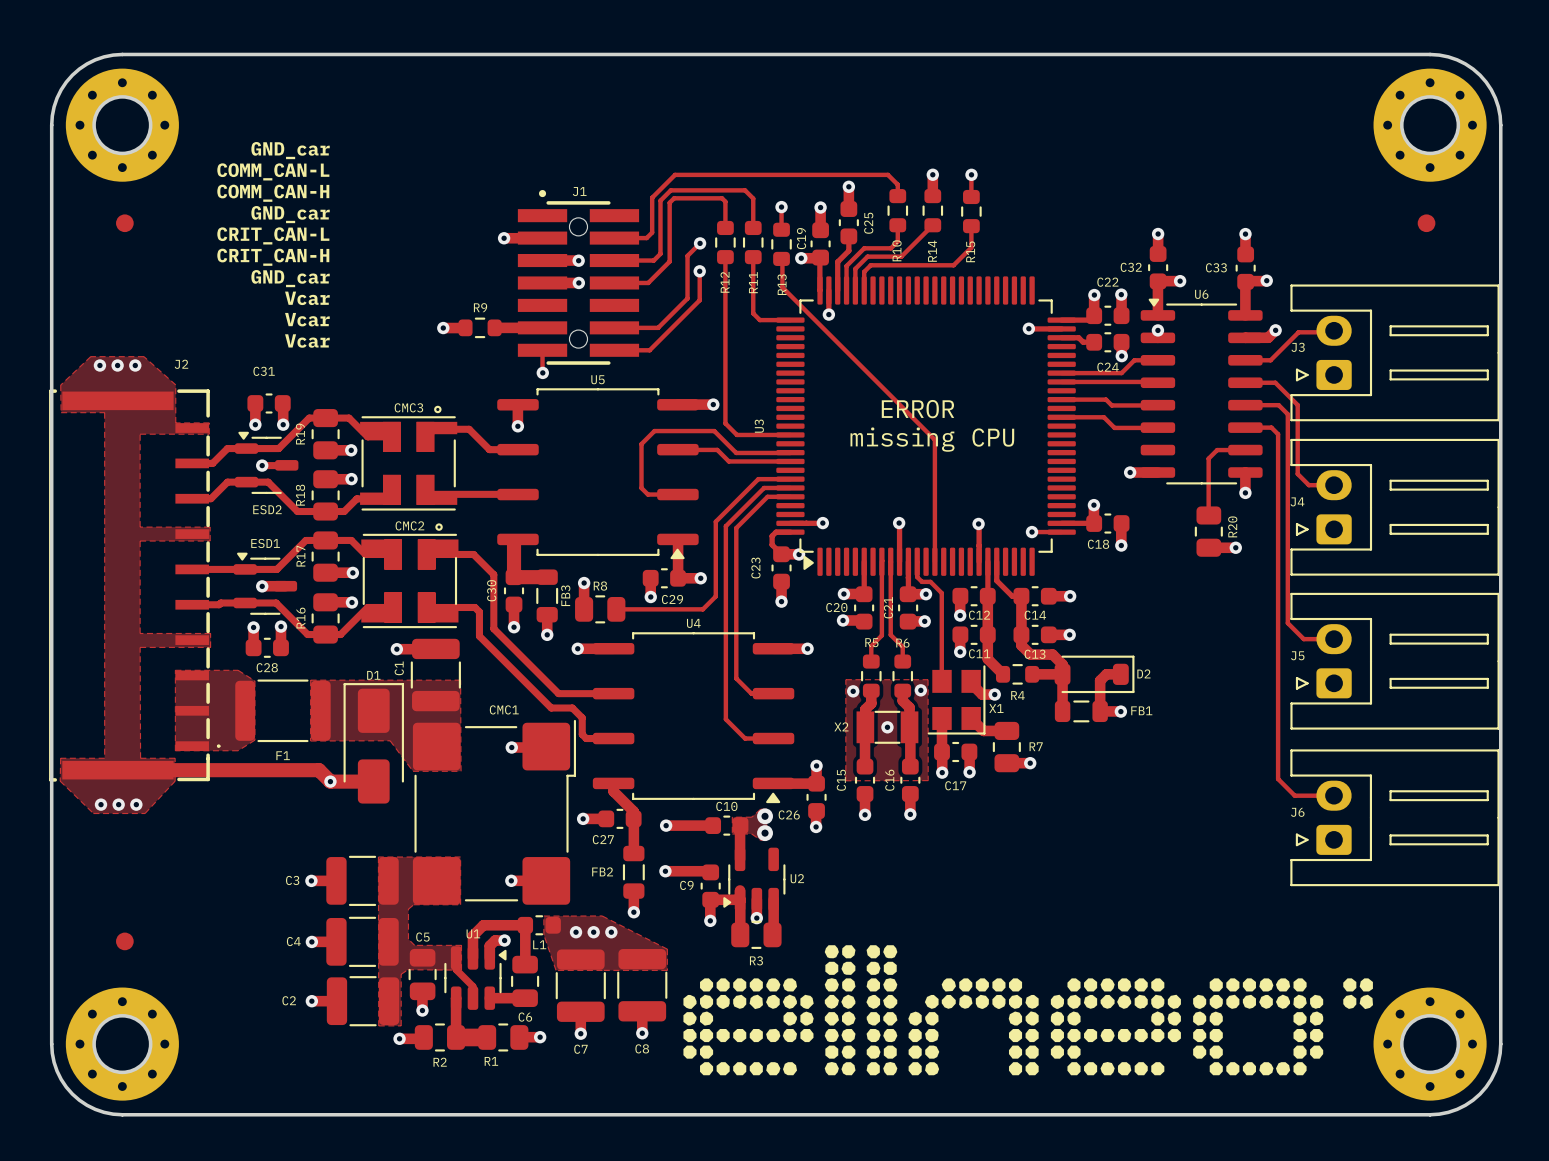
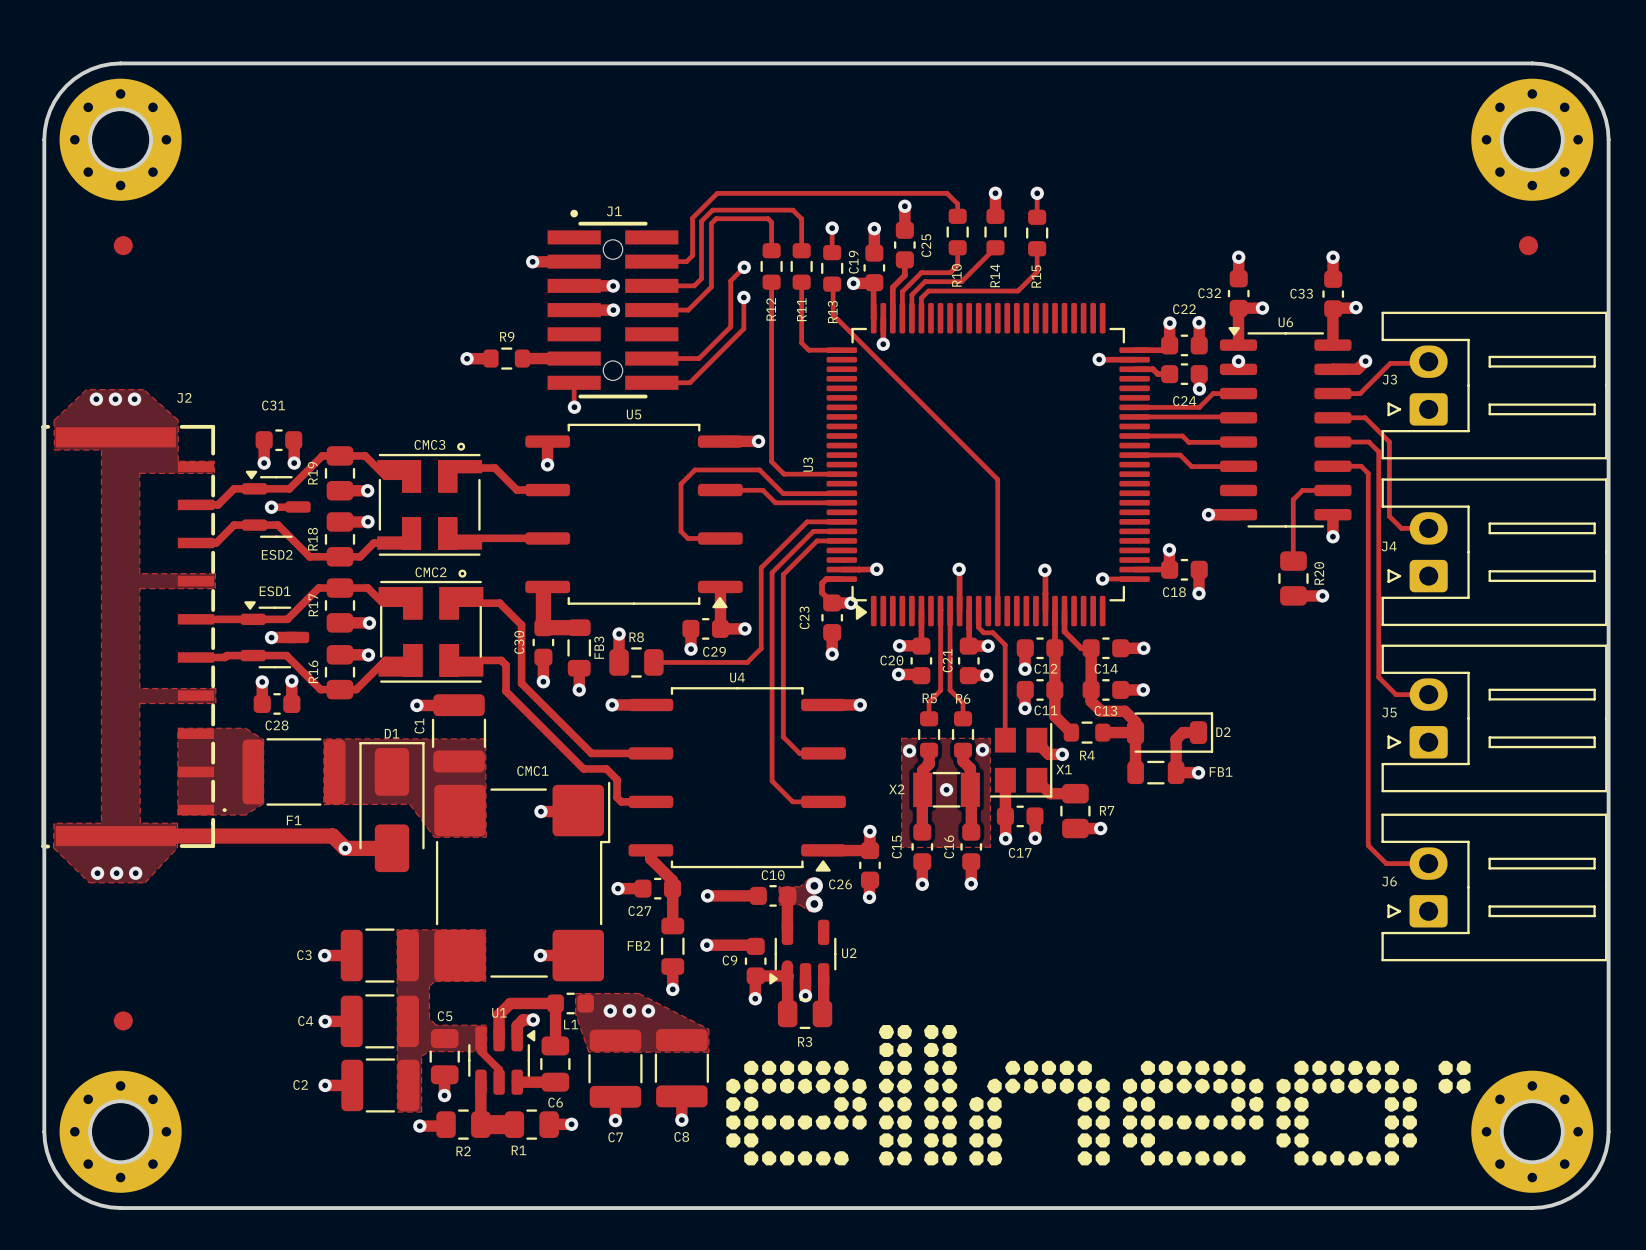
text: GND_car (290, 150) -> none
text: COMM_CAN-L (273, 171) -> none
text: COMM_CAN-H (273, 193) -> none
text: GND_car (290, 214) -> none
text: CRIT_CAN-L (273, 235) -> none
text: CRIT_CAN-H (273, 257) -> none
text: GND_car (290, 278) -> none
text: Vcar (307, 298) -> none
text: Vcar (307, 319) -> none
text: Vcar (307, 341) -> none
text: ERROR (917, 409) -> none
text: missing CPU (932, 439) -> none

